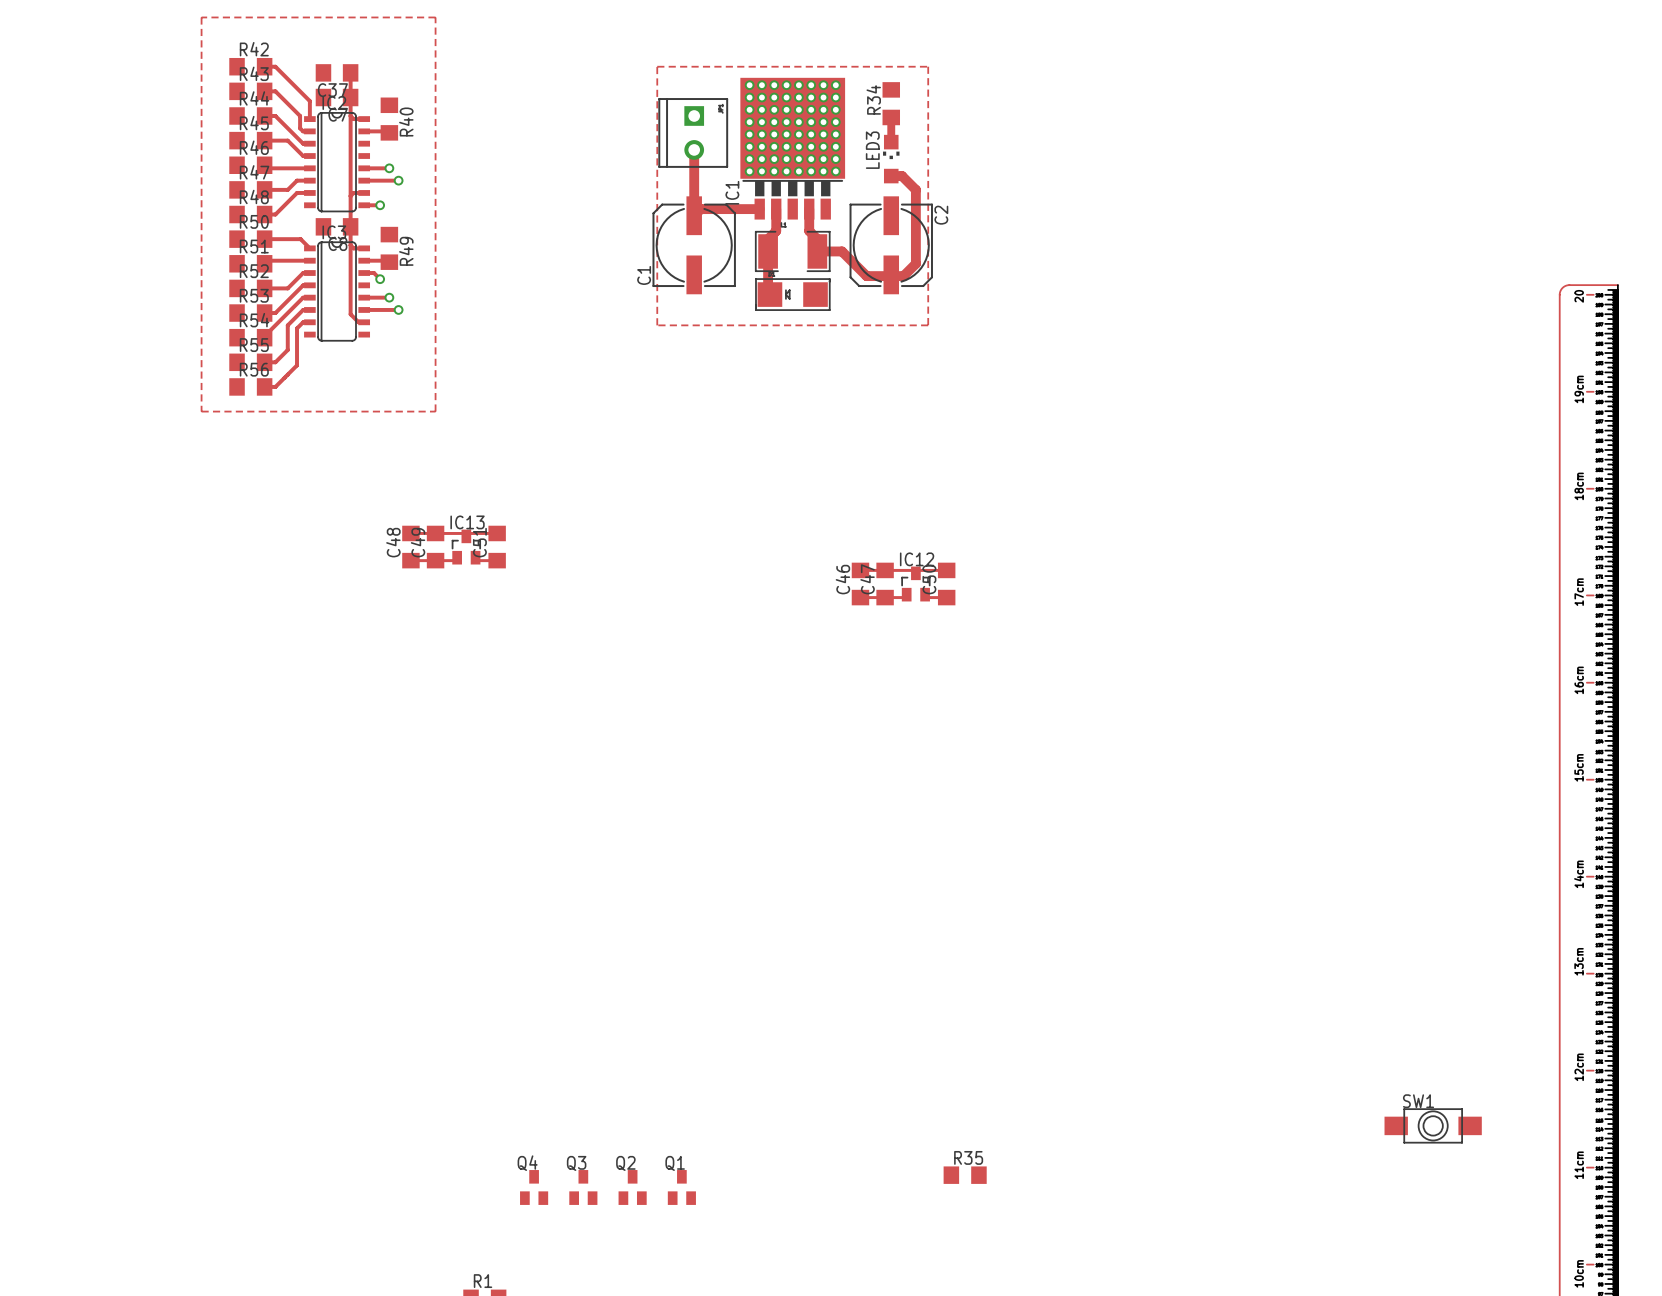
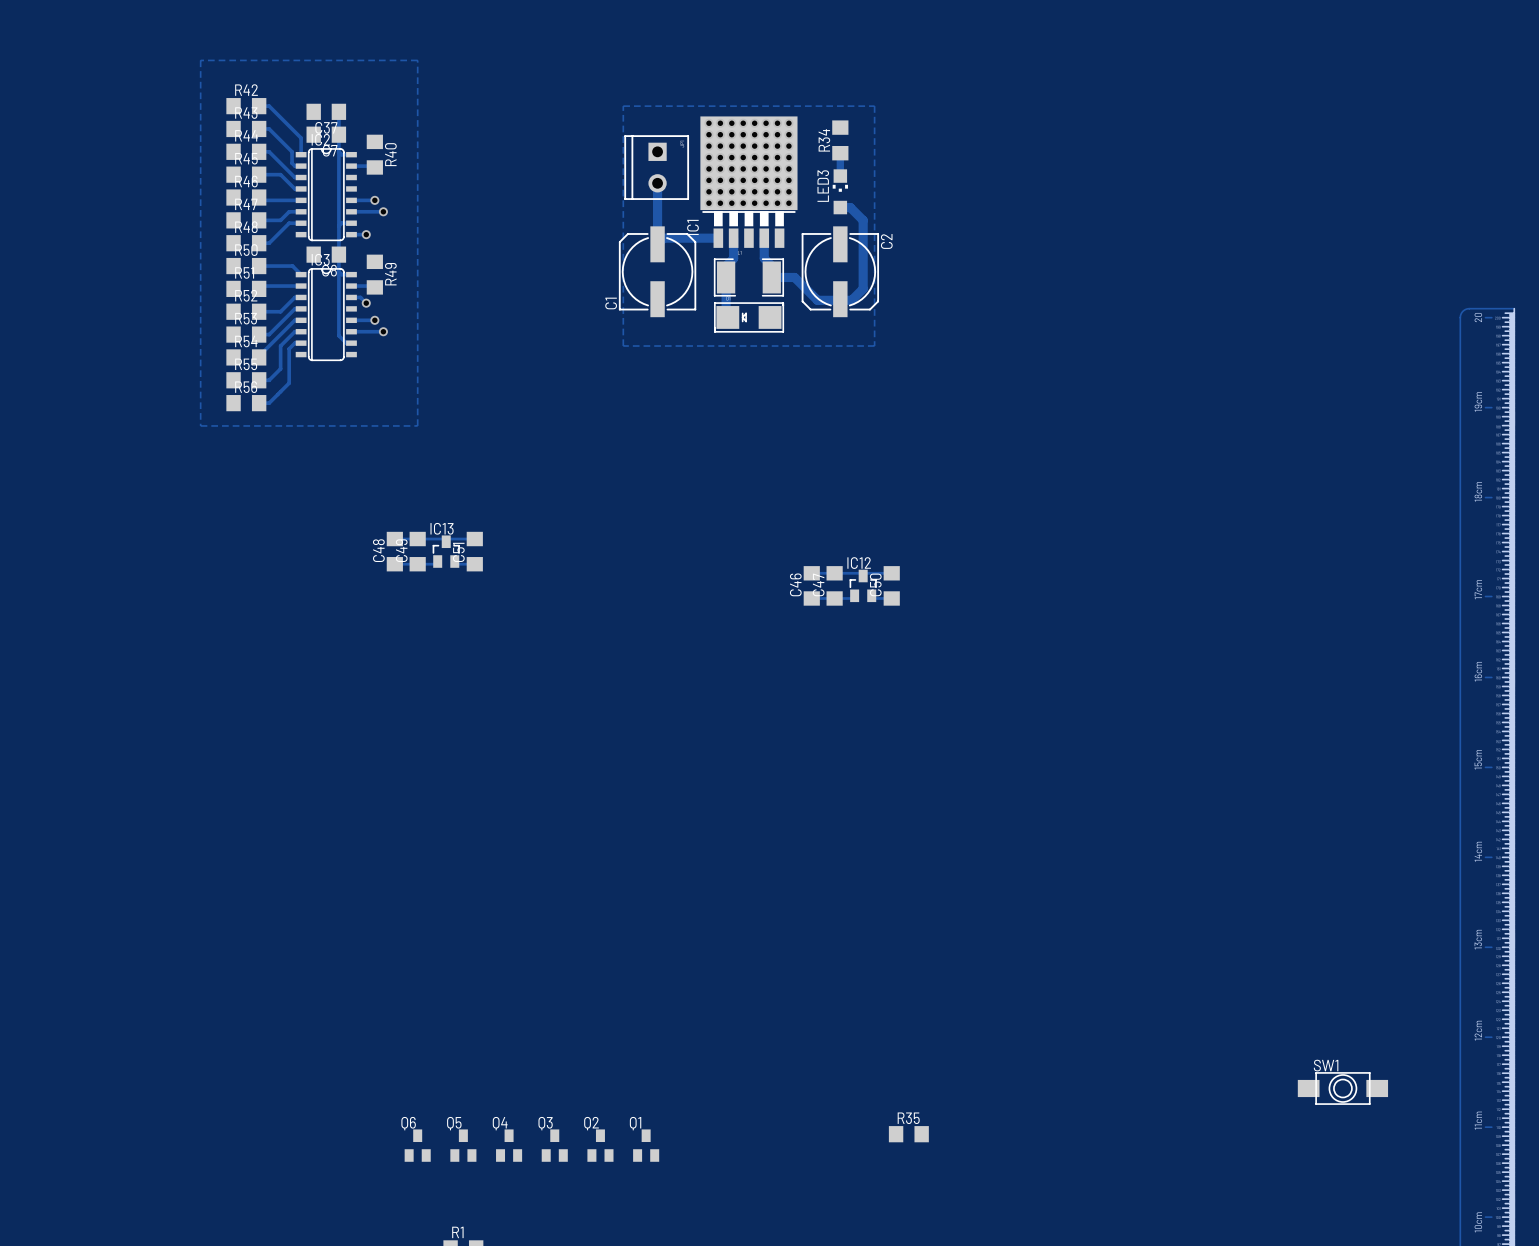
Q6: none -> (417, 1145)
Q5: none -> (463, 1145)

